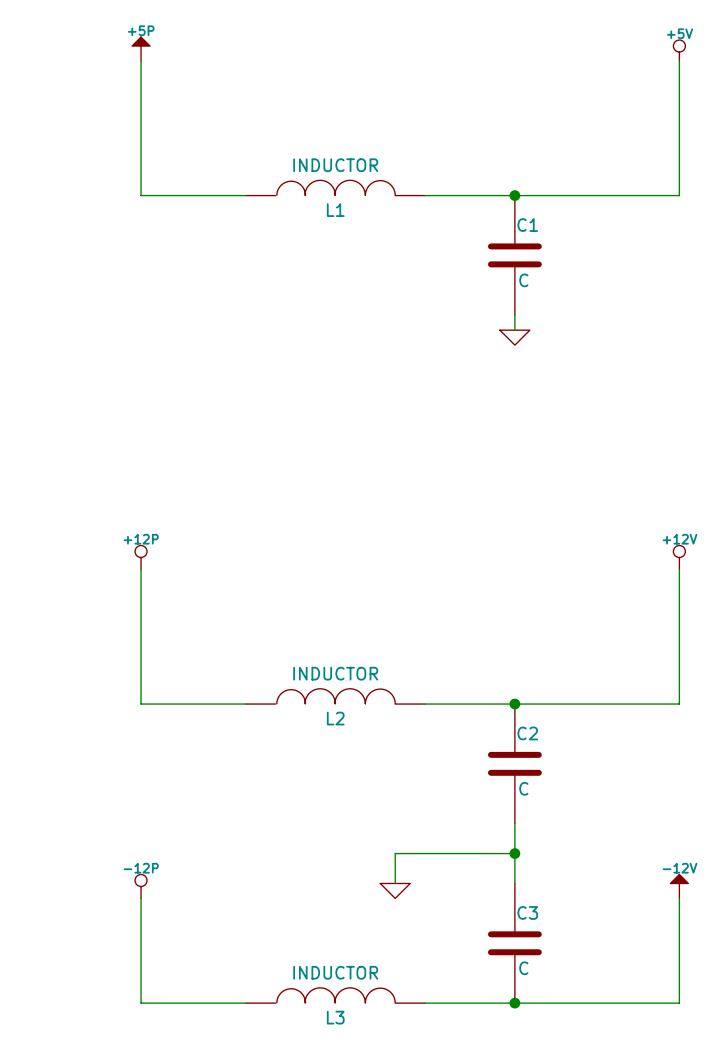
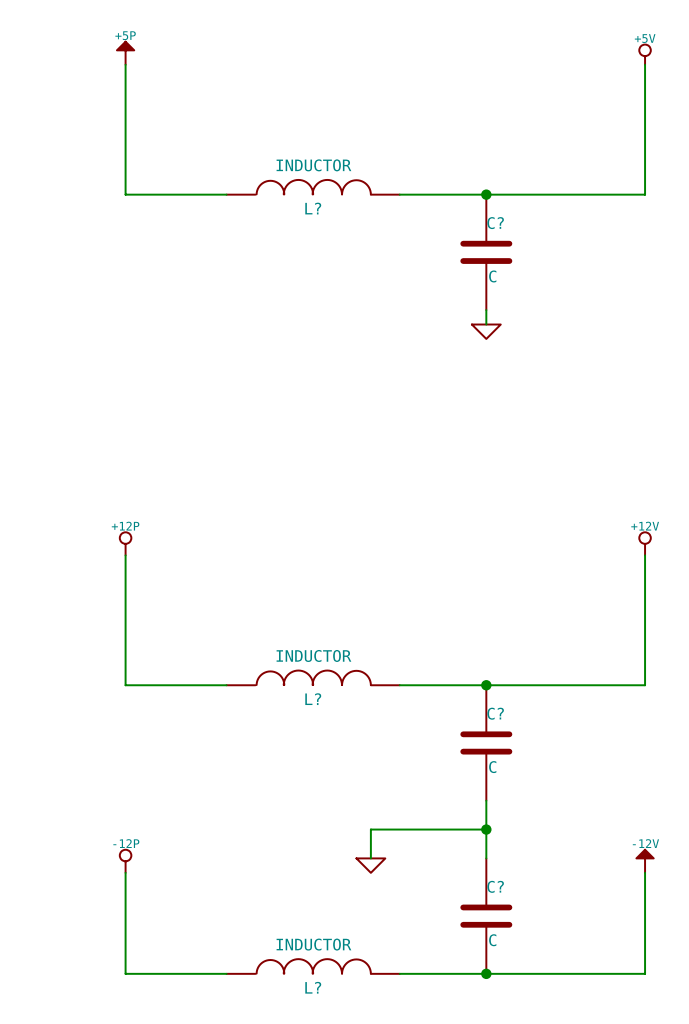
L1 name: L1 (335, 210) -> L? (313, 208)
C1 name: C1 (527, 225) -> C? (495, 223)
L2 name: L2 (335, 718) -> L? (313, 699)
C2 name: C2 (527, 733) -> C? (495, 713)
C3 name: C3 (527, 912) -> C? (495, 886)
L3 name: L3 (335, 1017) -> L? (313, 987)

